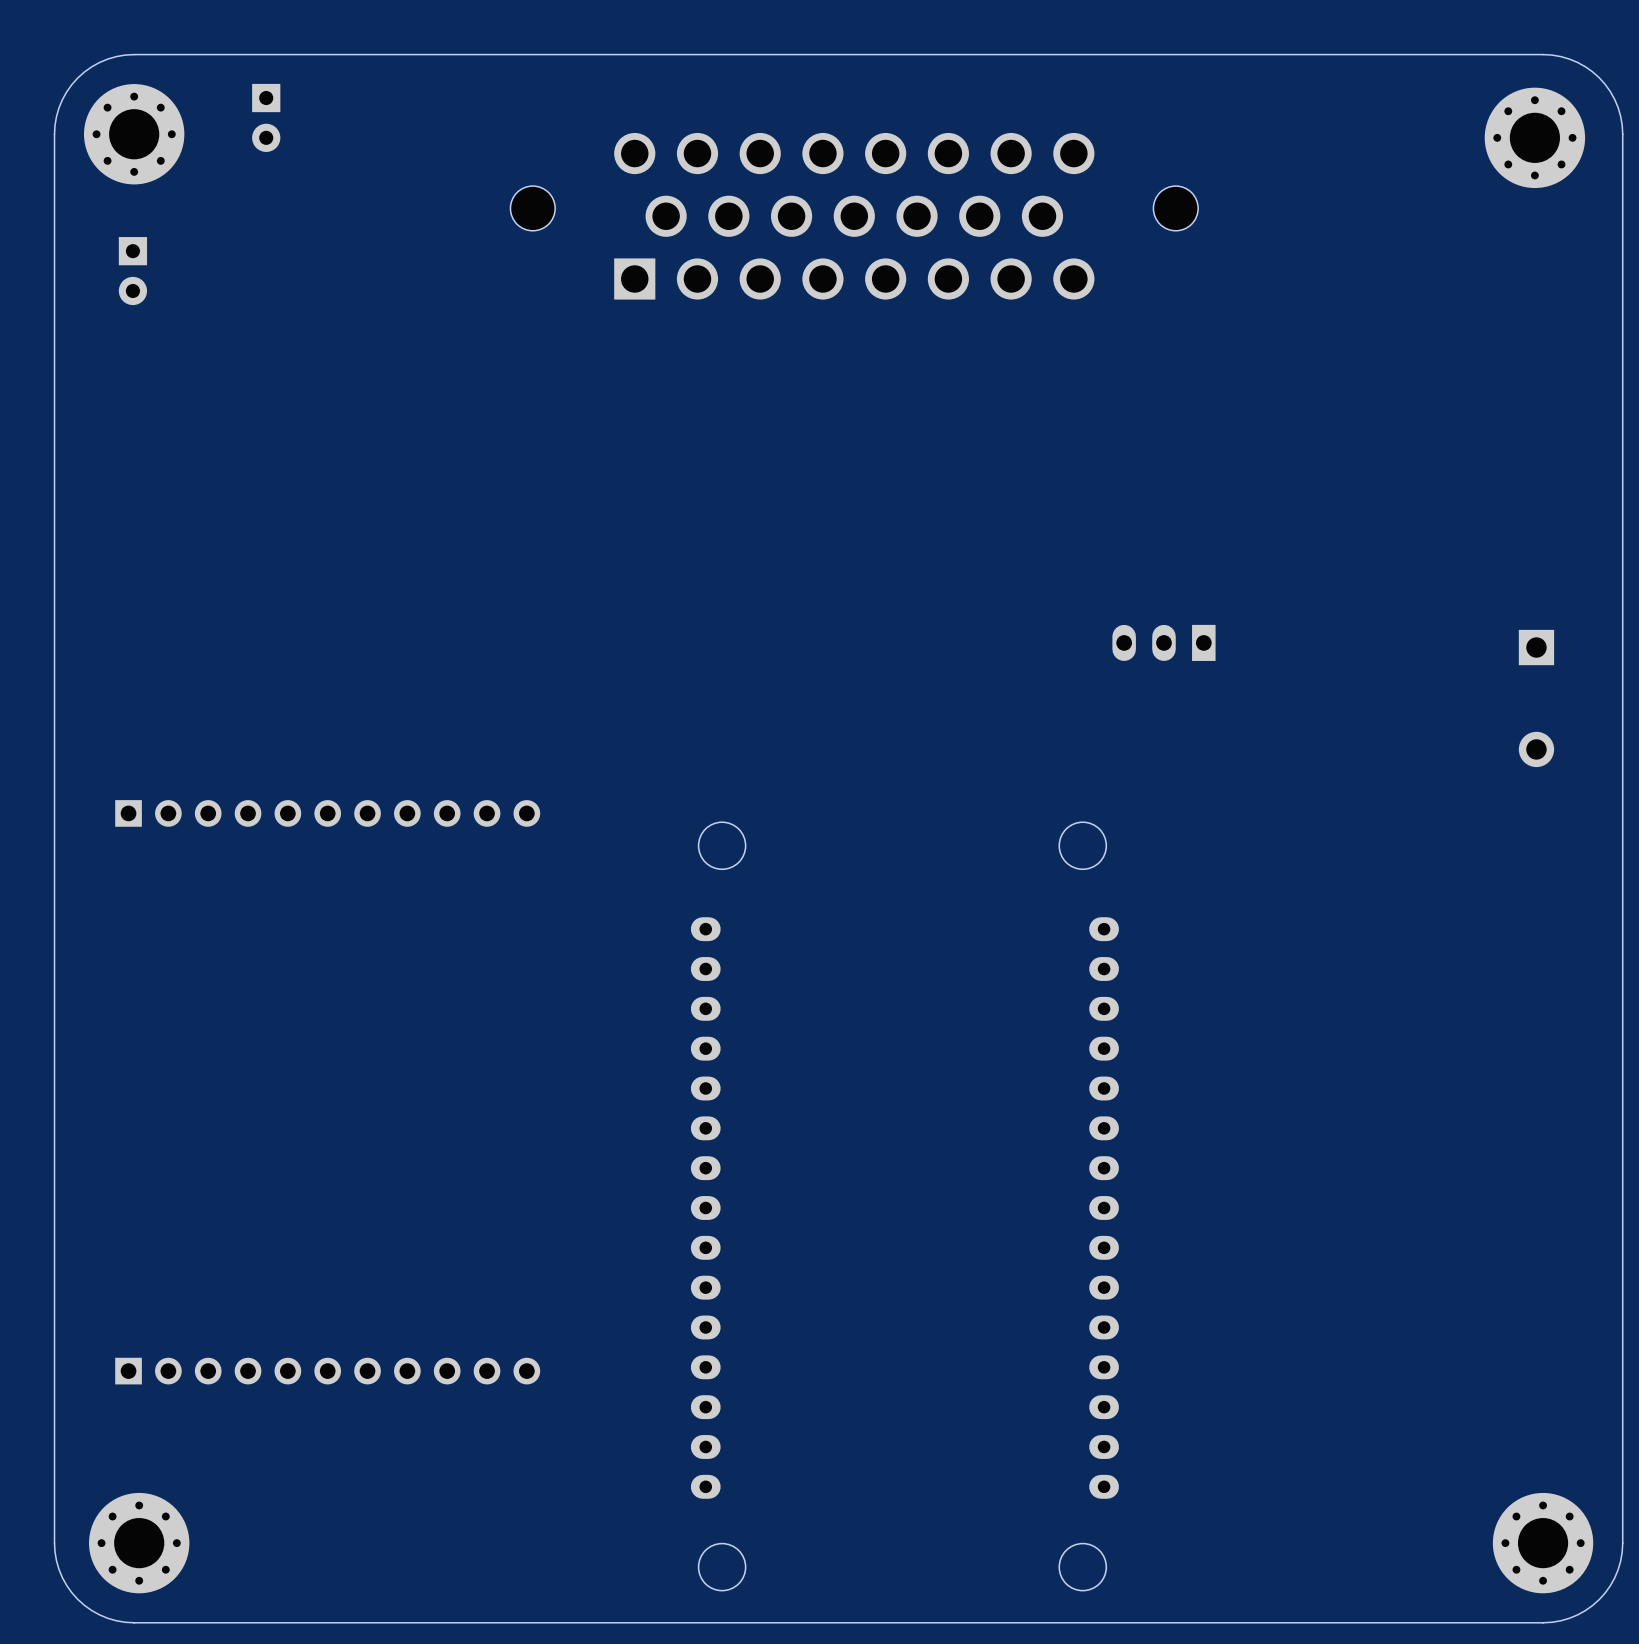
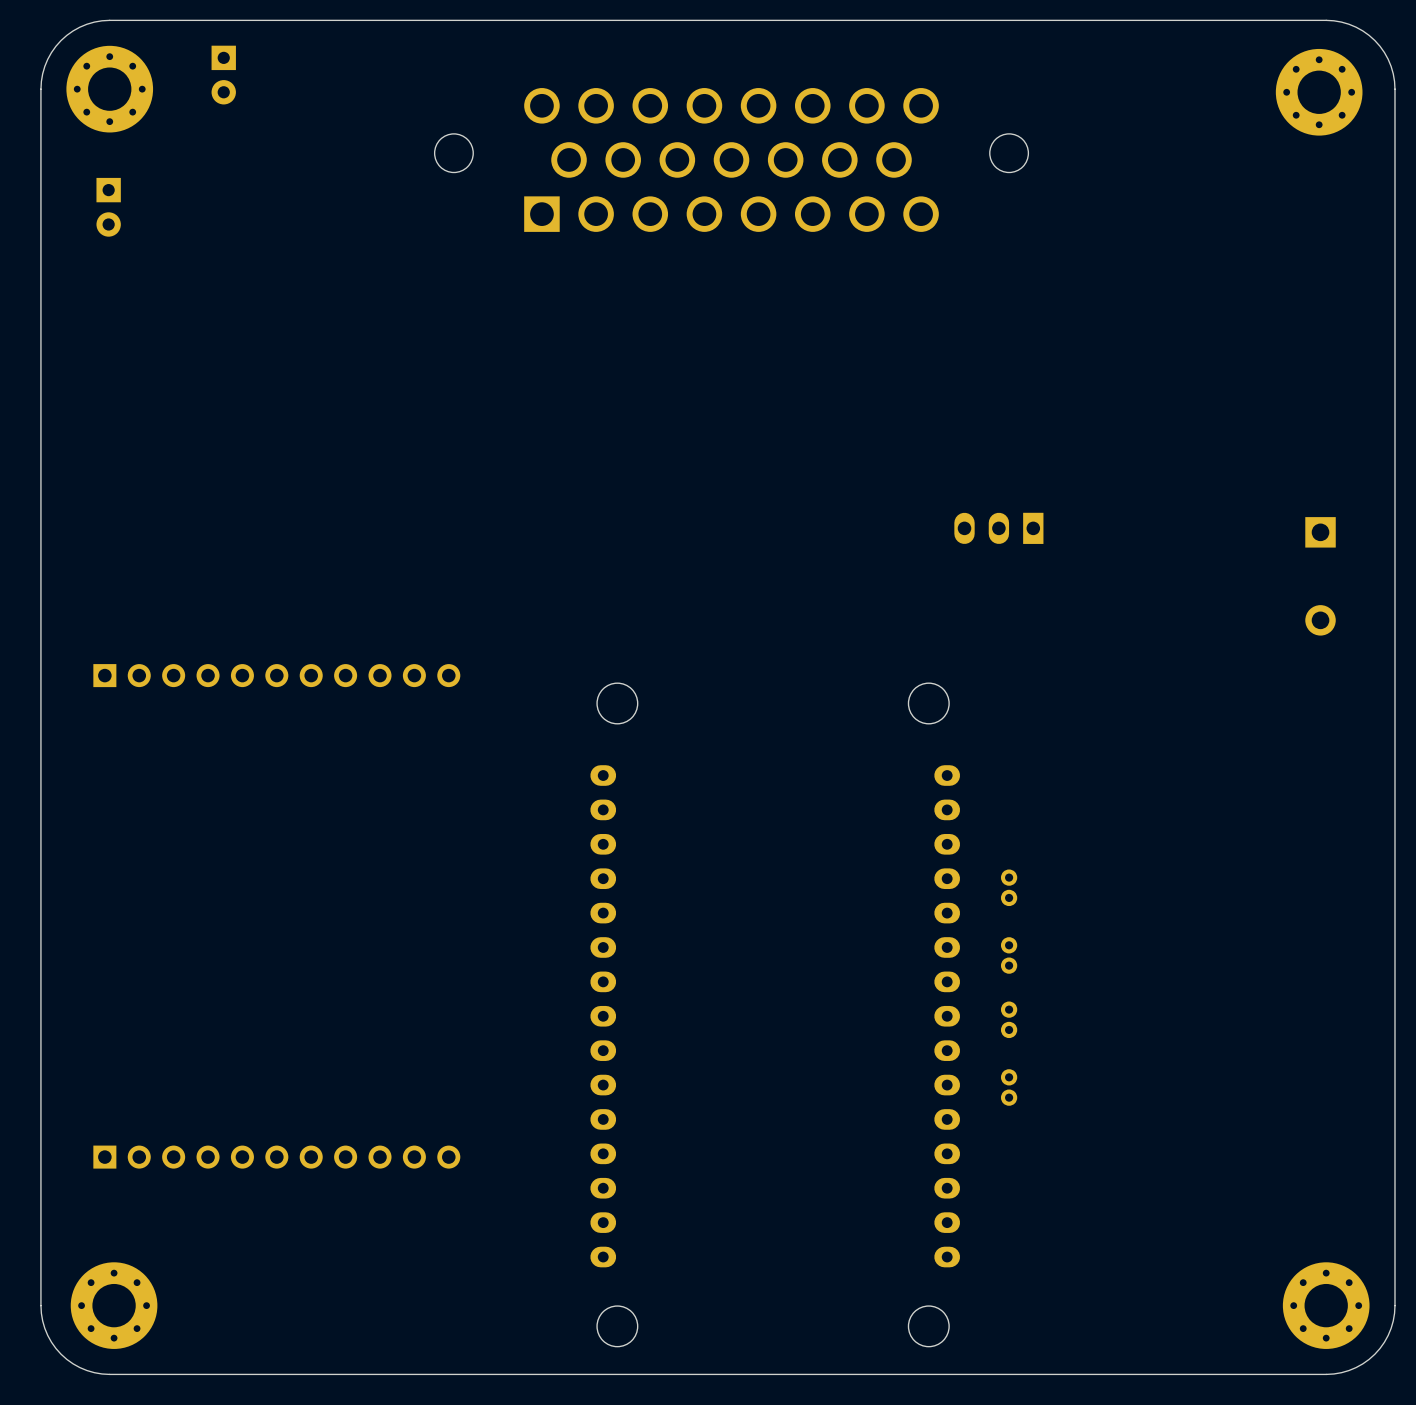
part: none -> (1009, 887)
part: none -> (1009, 955)
part: none -> (1009, 1019)
part: none -> (1009, 1087)

